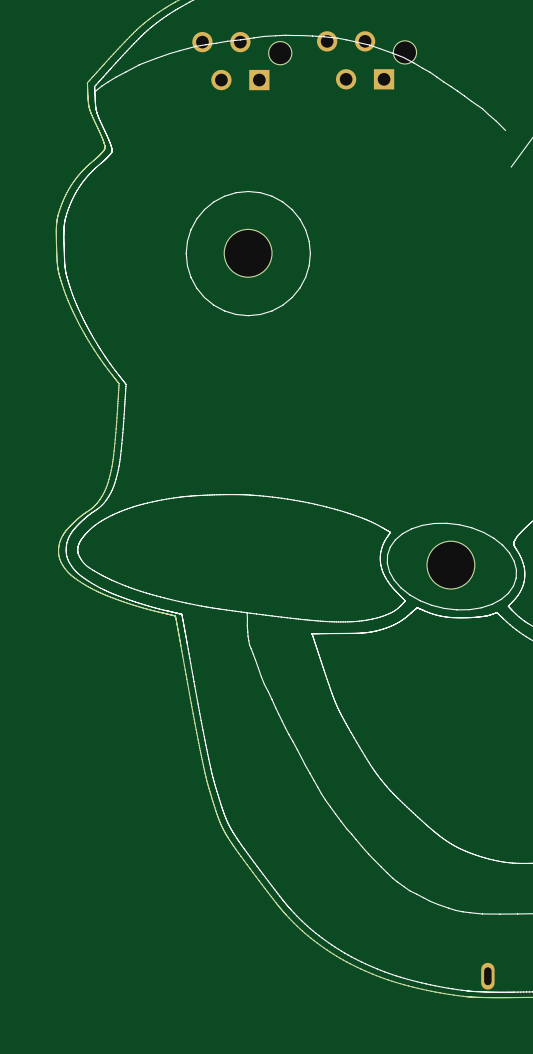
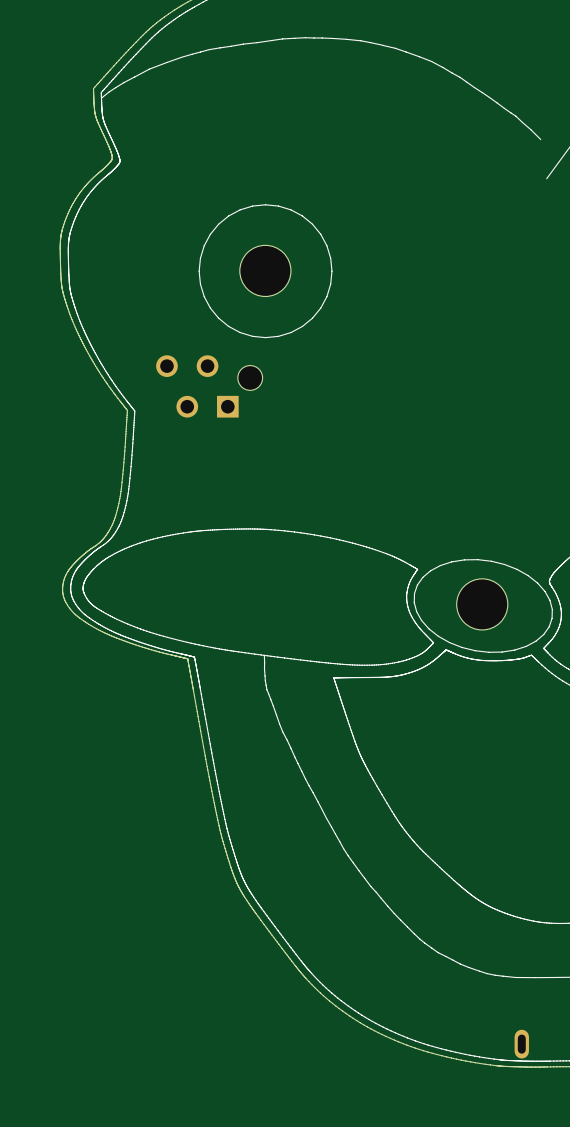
part: (366, 60) -> none
part: (242, 61) -> none
part: none -> (209, 386)

